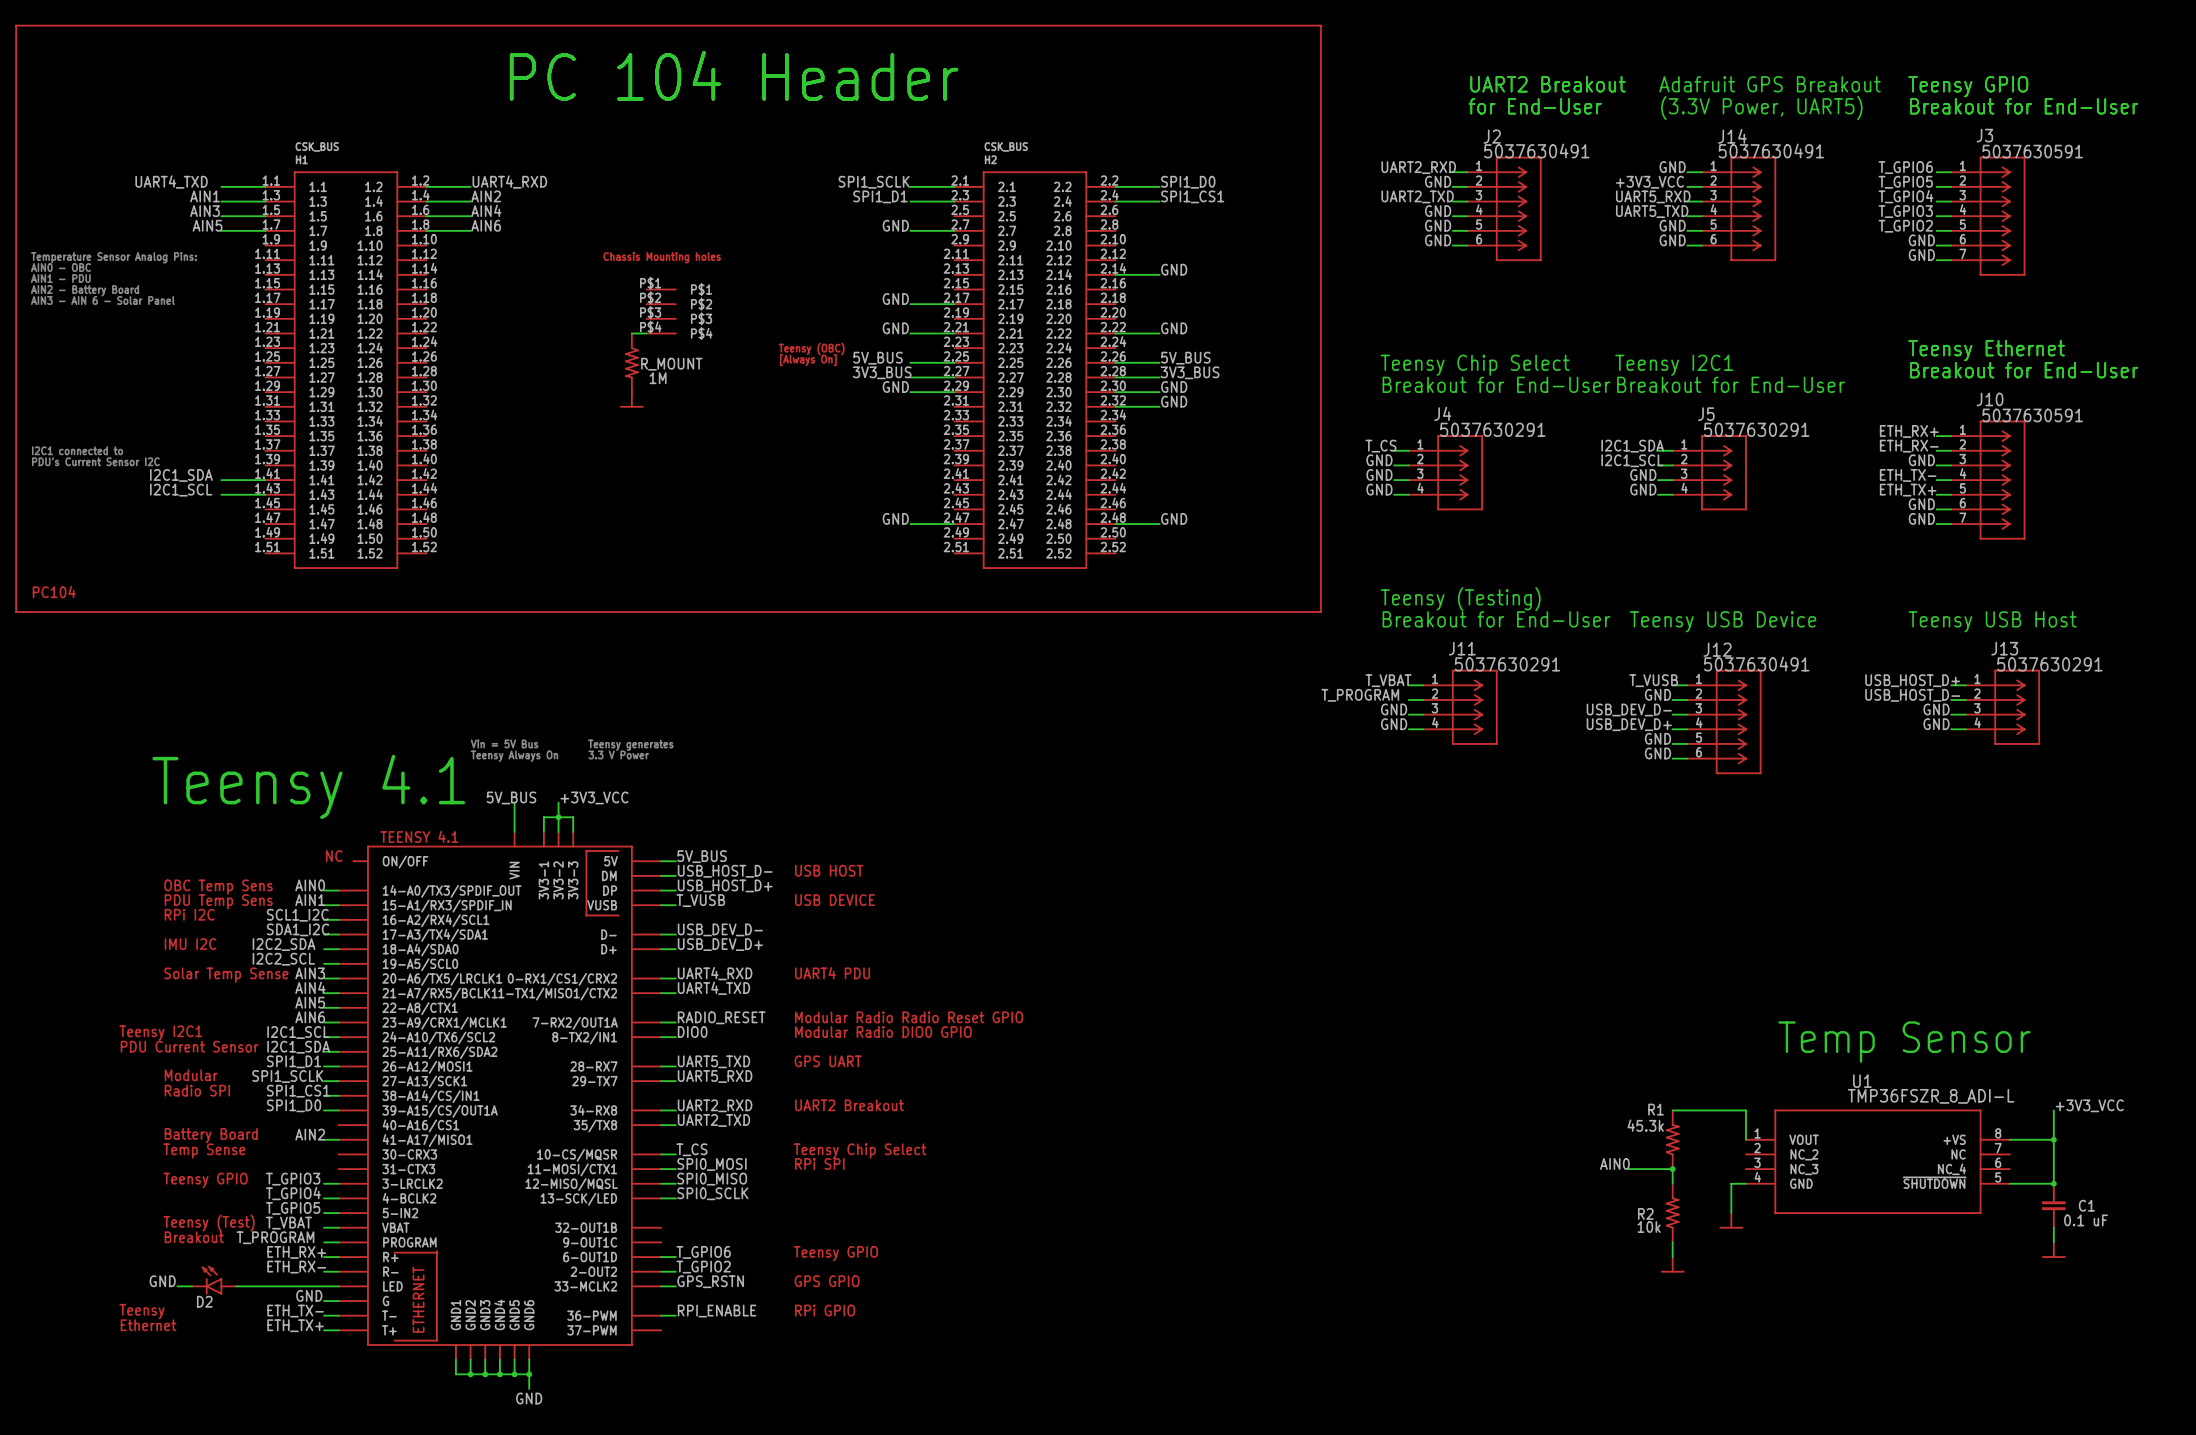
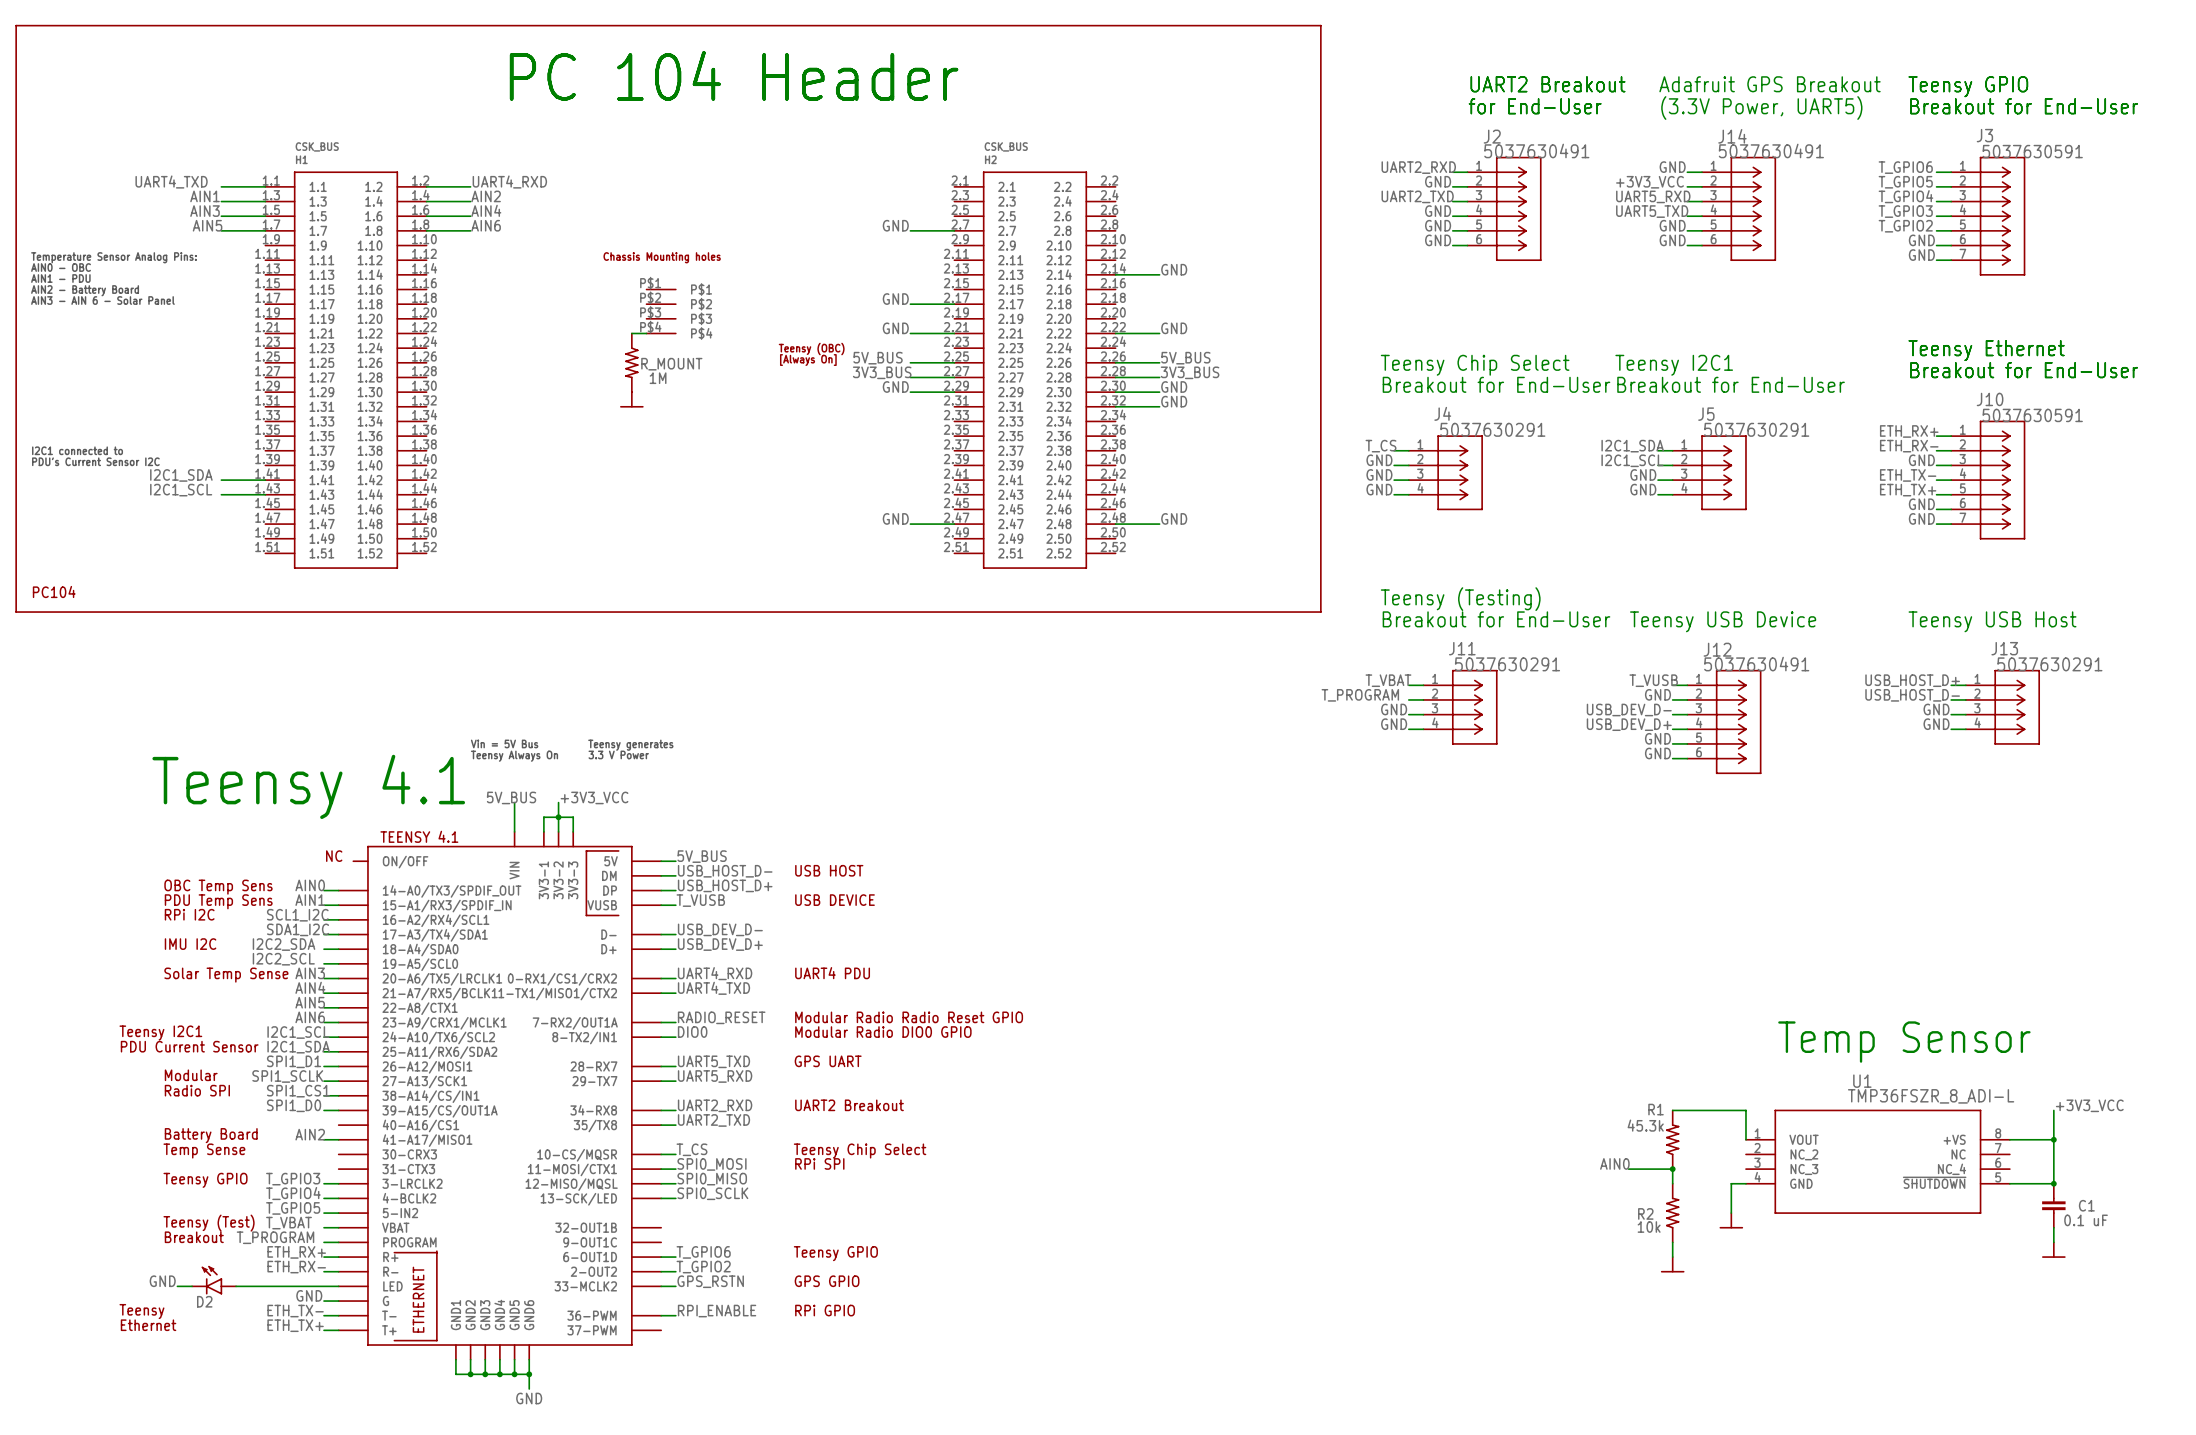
label: SPI1_SCLK (874, 182) -> none
label: SPI1_D0 (1188, 182) -> none
wire: (910, 186) (954, 186) -> none
wire: (1115, 186) (1159, 186) -> none
label: SPI1_D1 (880, 196) -> none
label: SPI1_CS1 (1192, 196) -> none
wire: (910, 201) (954, 201) -> none
wire: (1115, 201) (1159, 201) -> none

